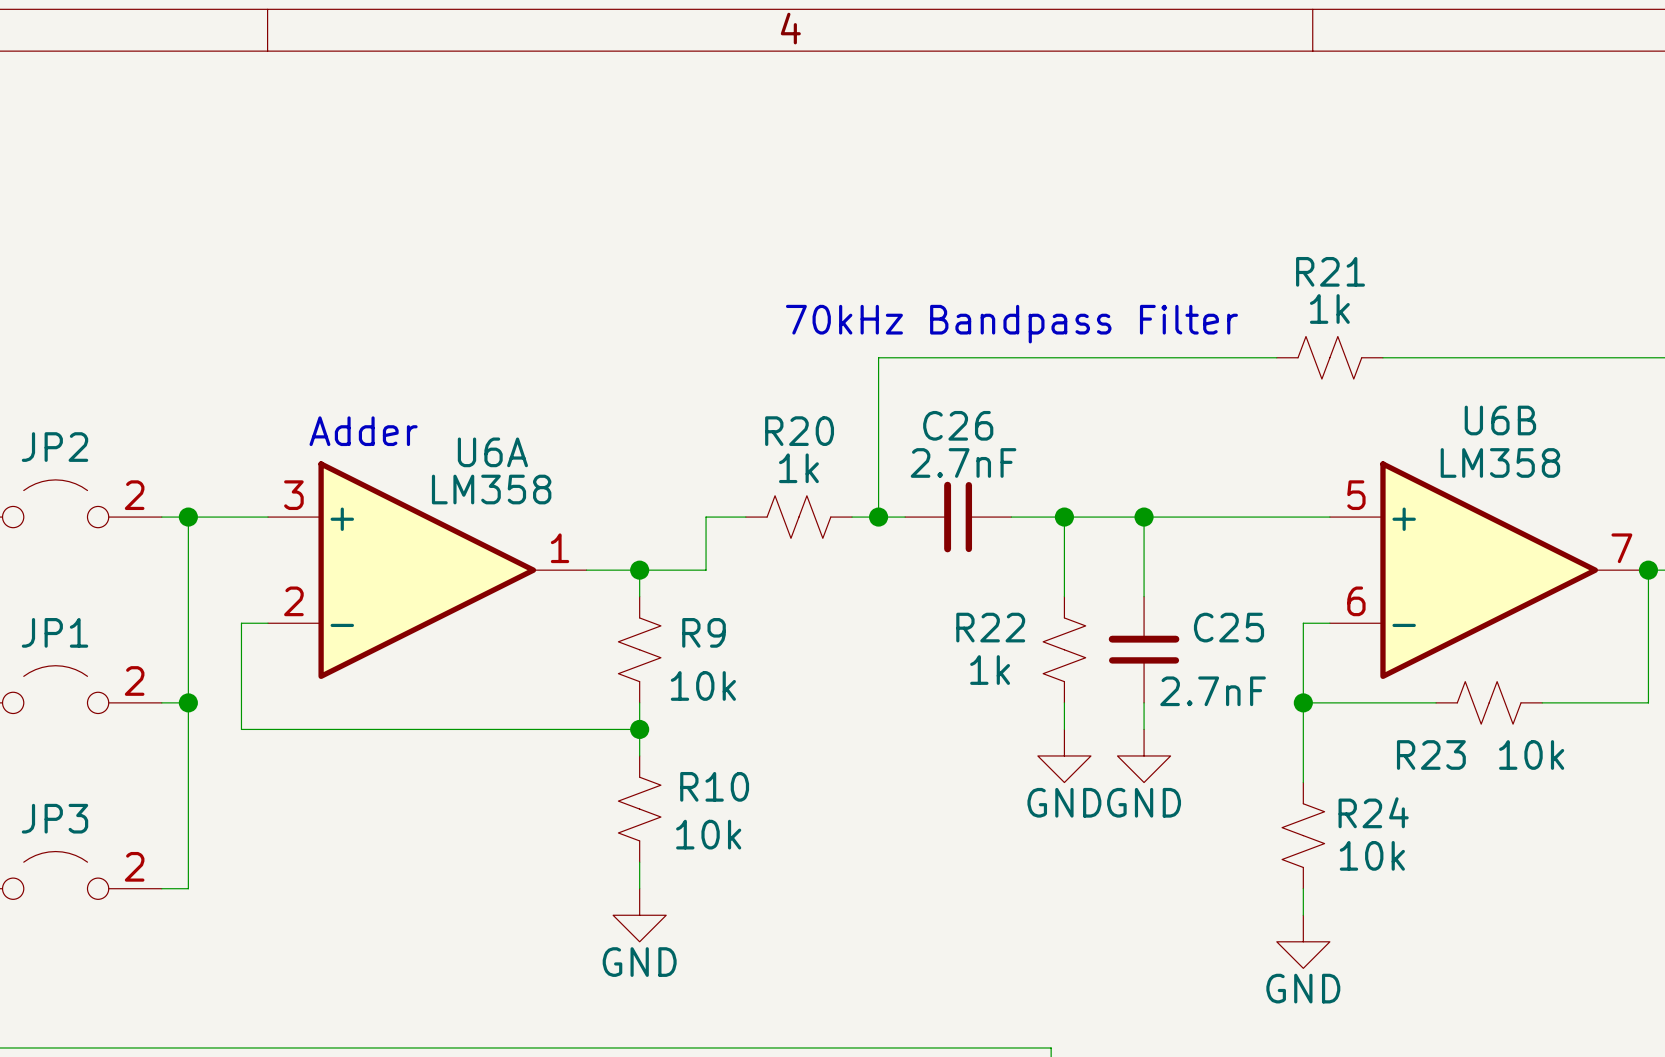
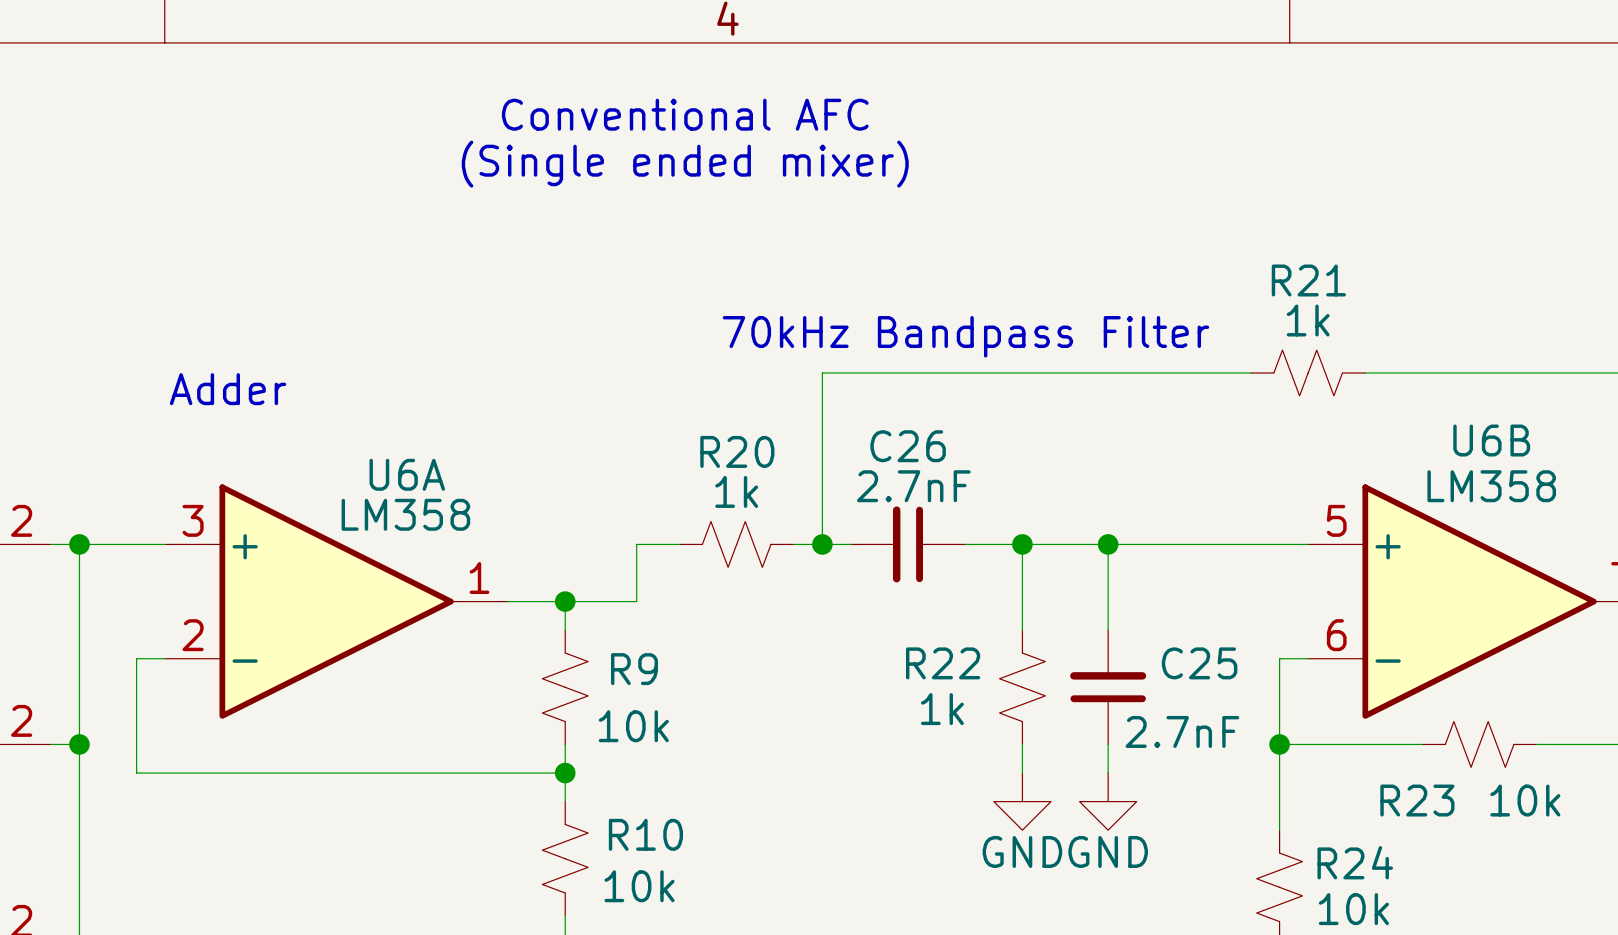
text: none -> Conventional AFC (685, 114)
text: none -> (Single ended mixer) (685, 164)
text position: Adder (363, 431) -> Adder (228, 389)

